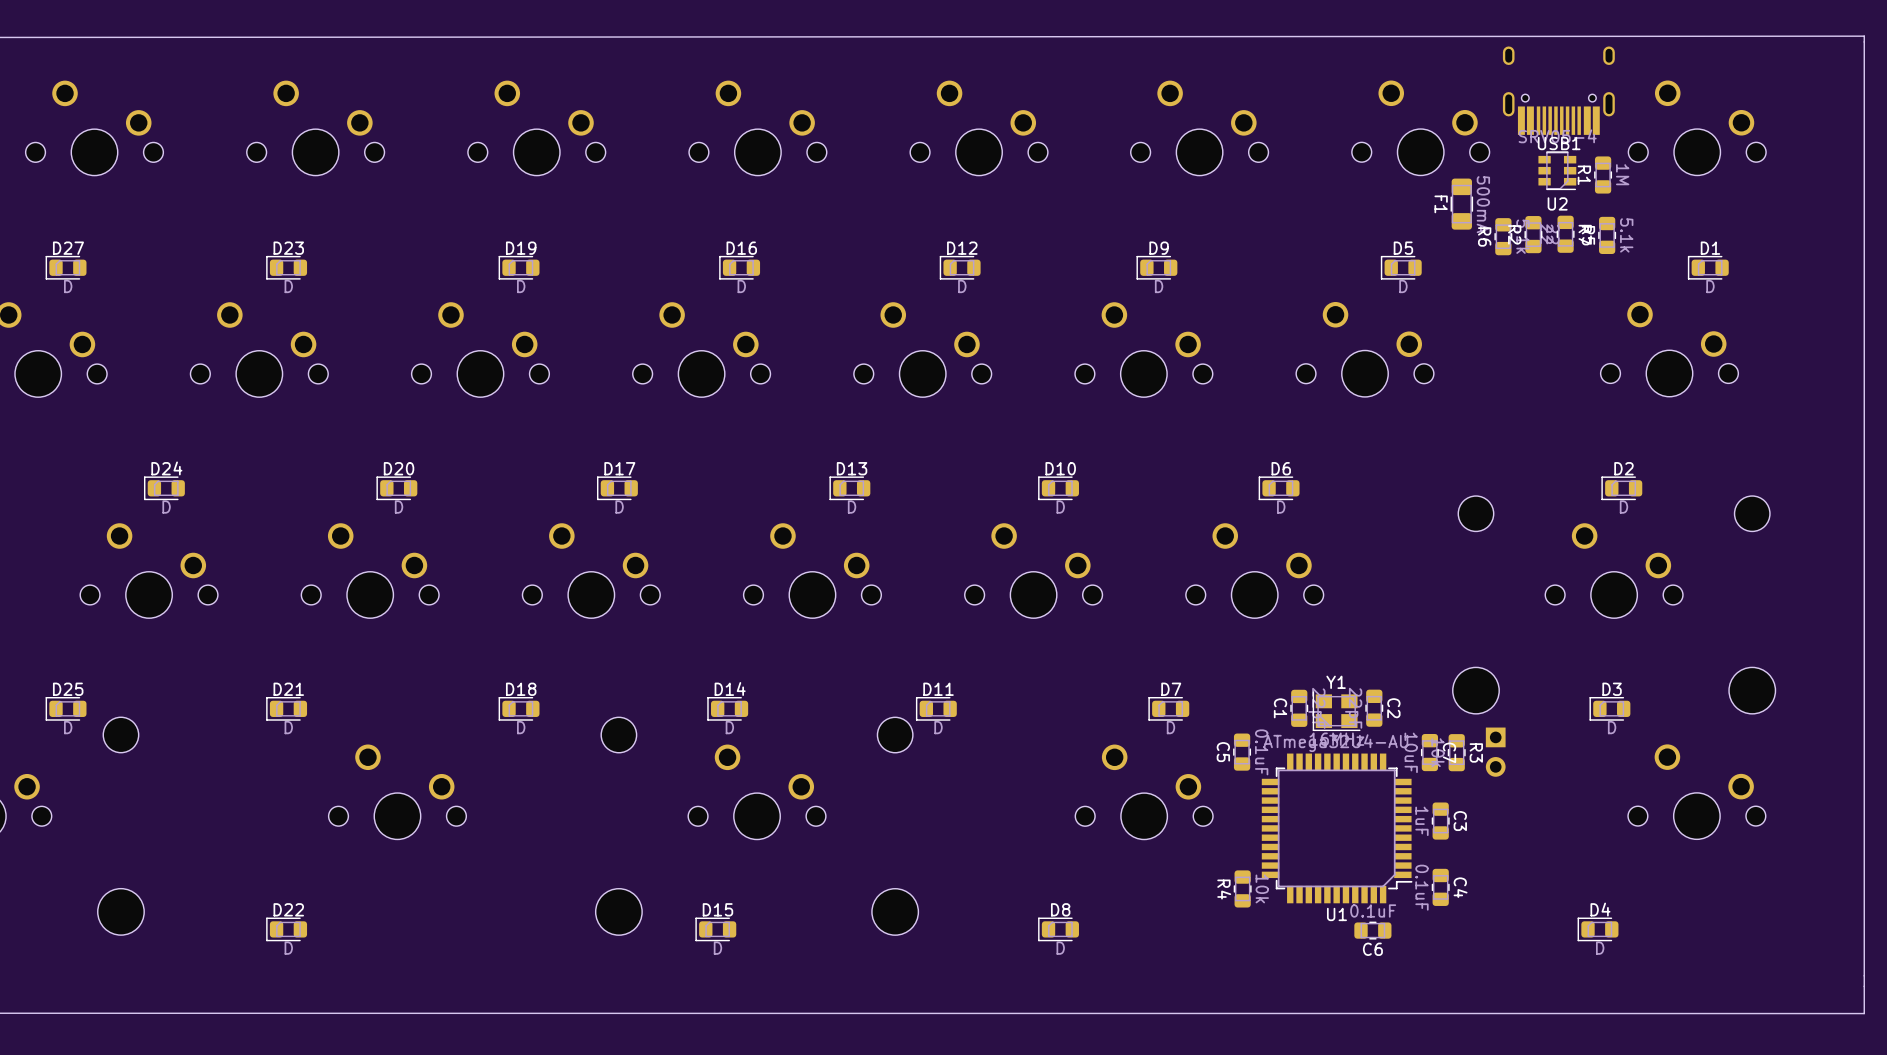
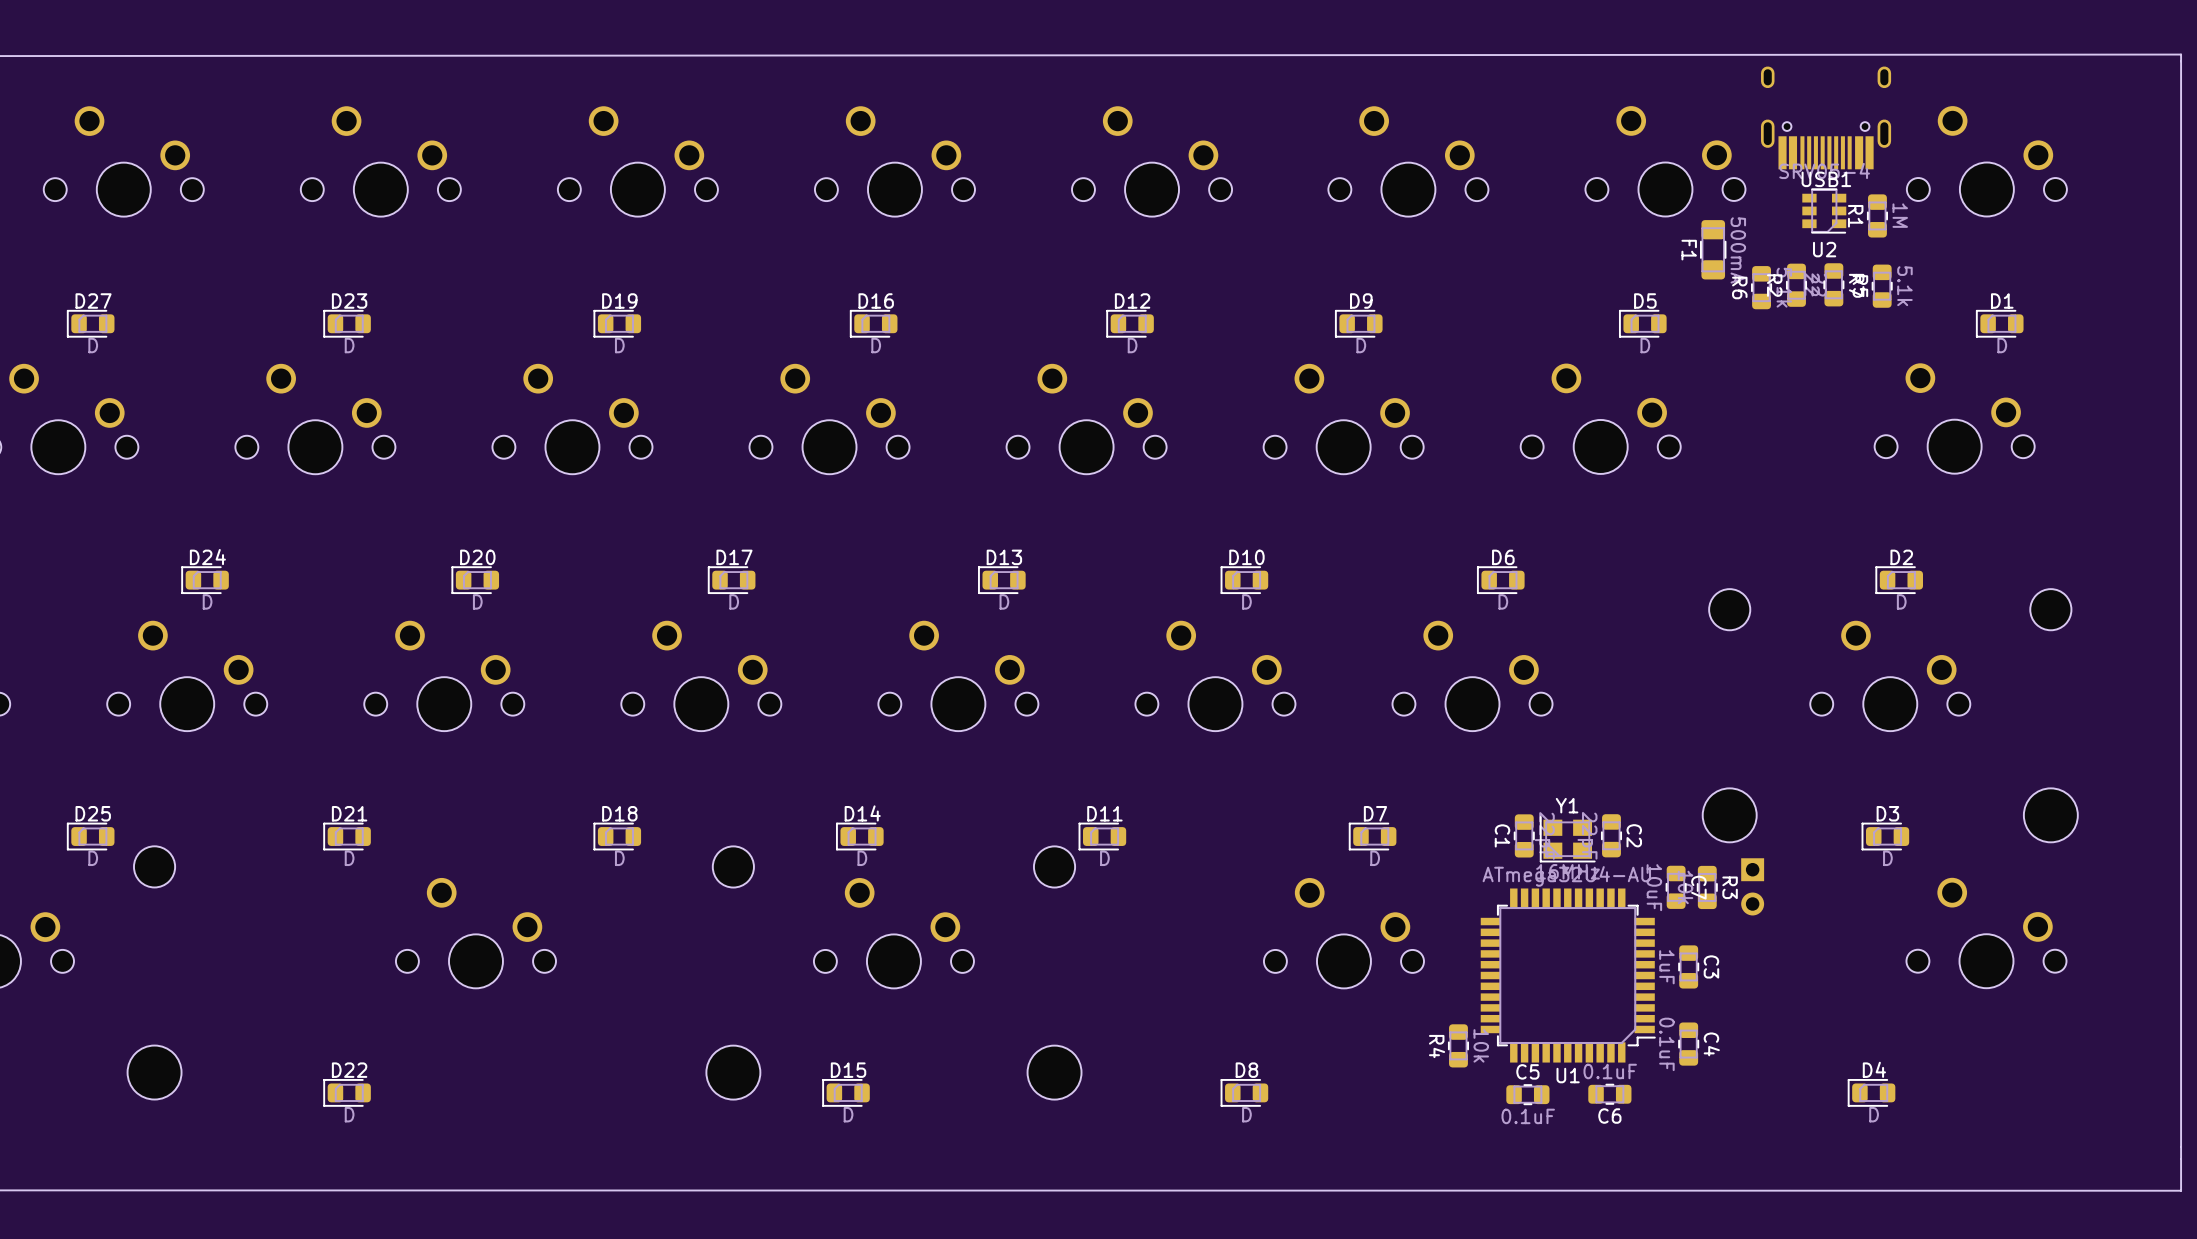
C5 rotation: 0° (1242, 752) -> 90° clockwise (1527, 1094)
C5 position: (1242, 752) -> (1527, 1094)

